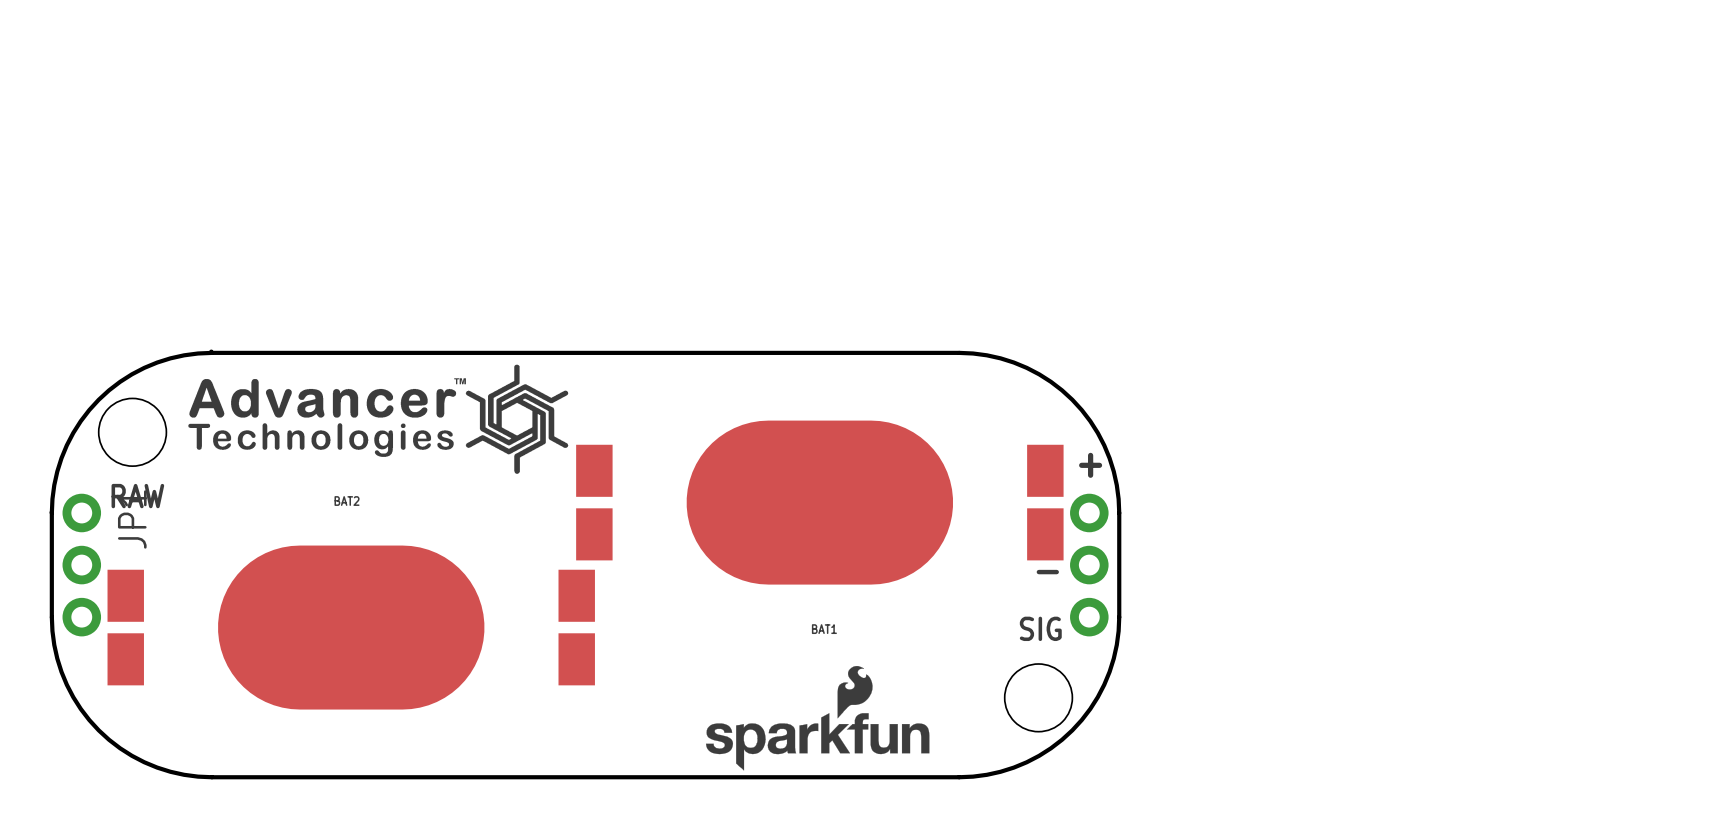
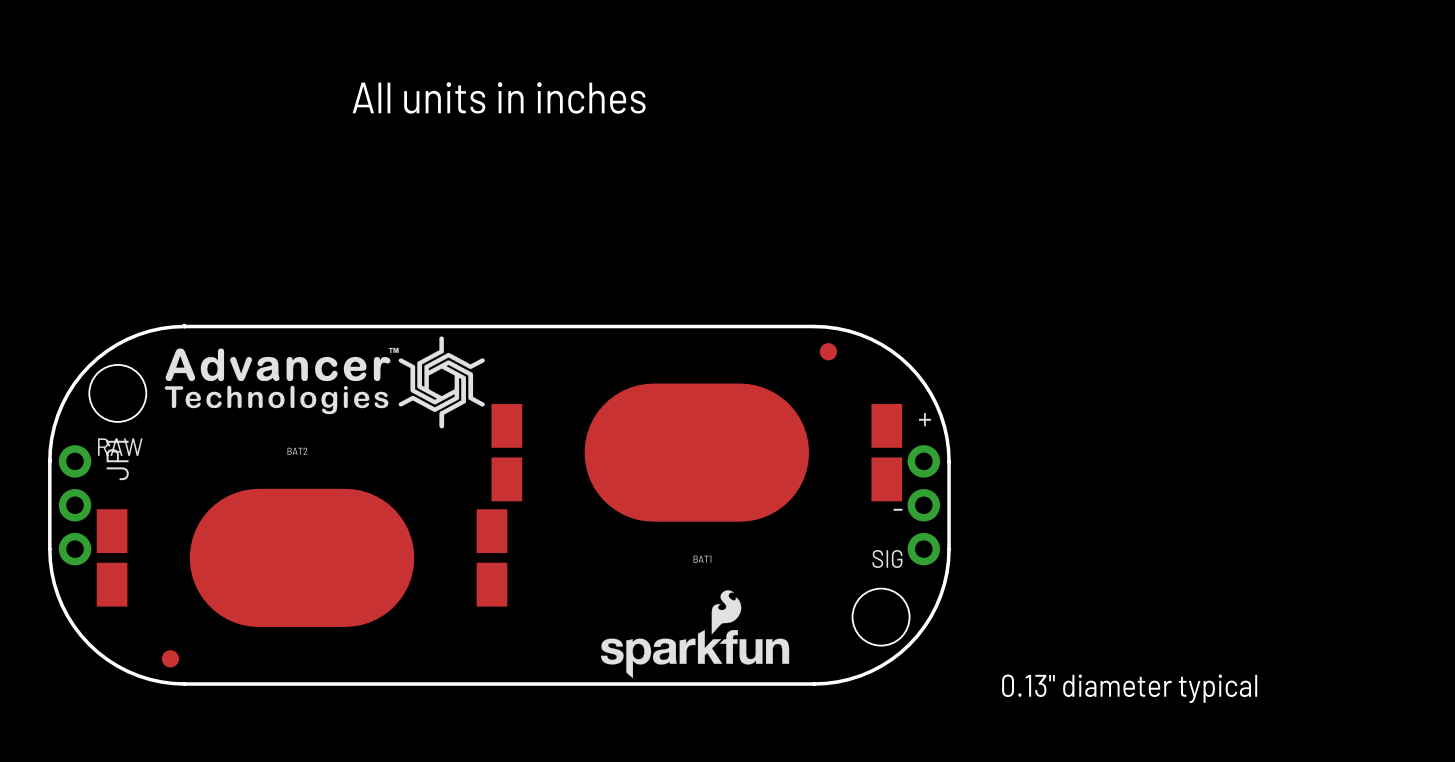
text: none -> All units in inches (499, 97)
part: none -> (828, 351)
part: none -> (170, 658)
text: none -> 0.13" diameter typical (1129, 688)

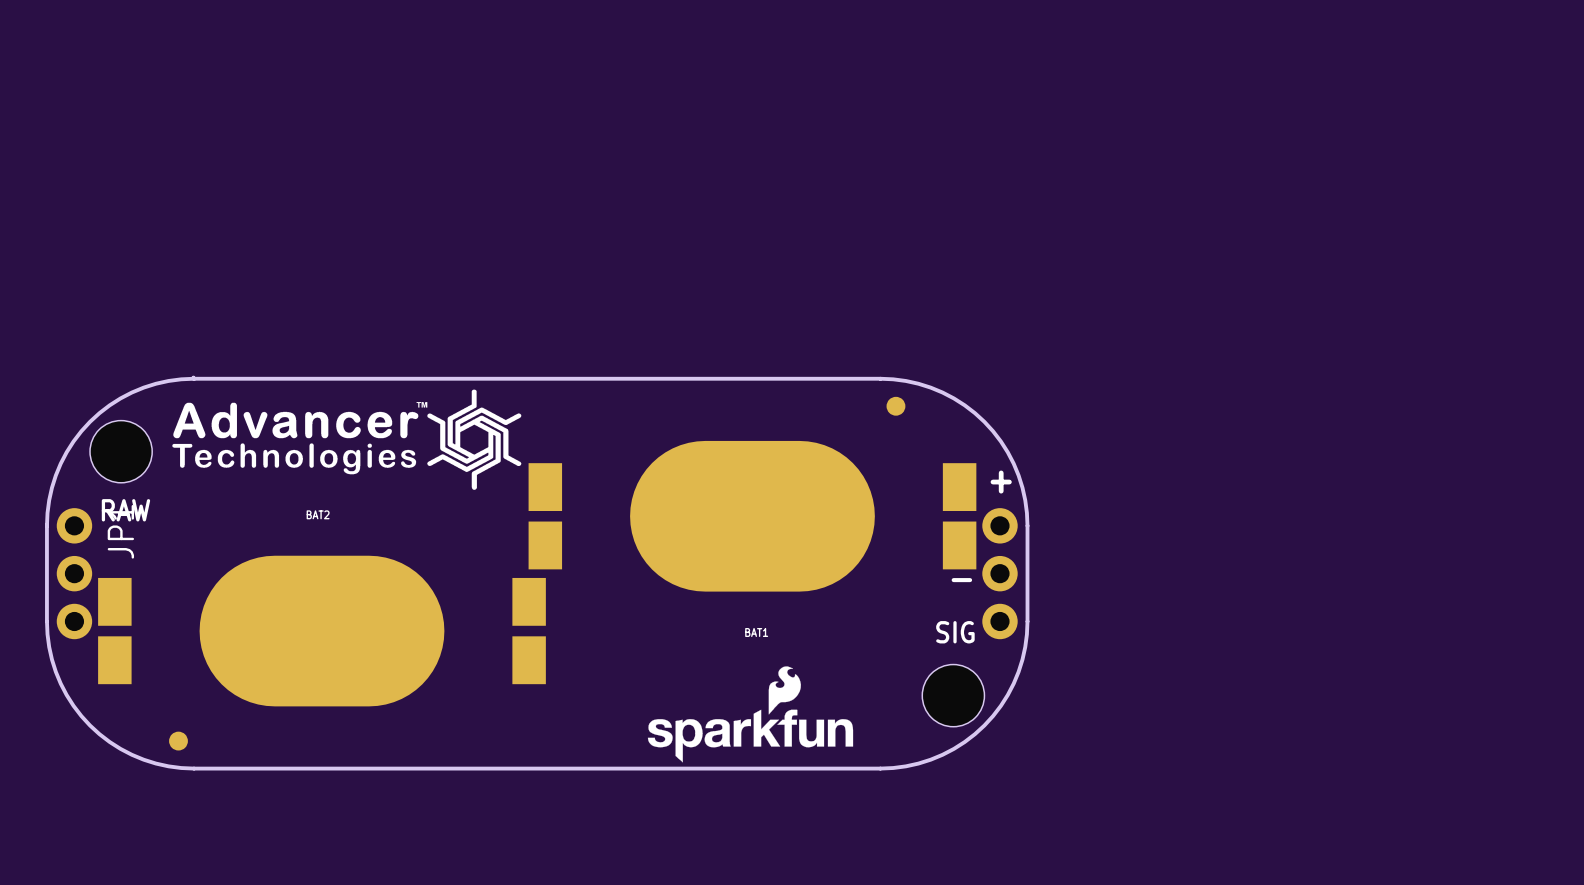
text: All units in inches (499, 97) -> none
text: 0.13" diameter typical (1129, 688) -> none

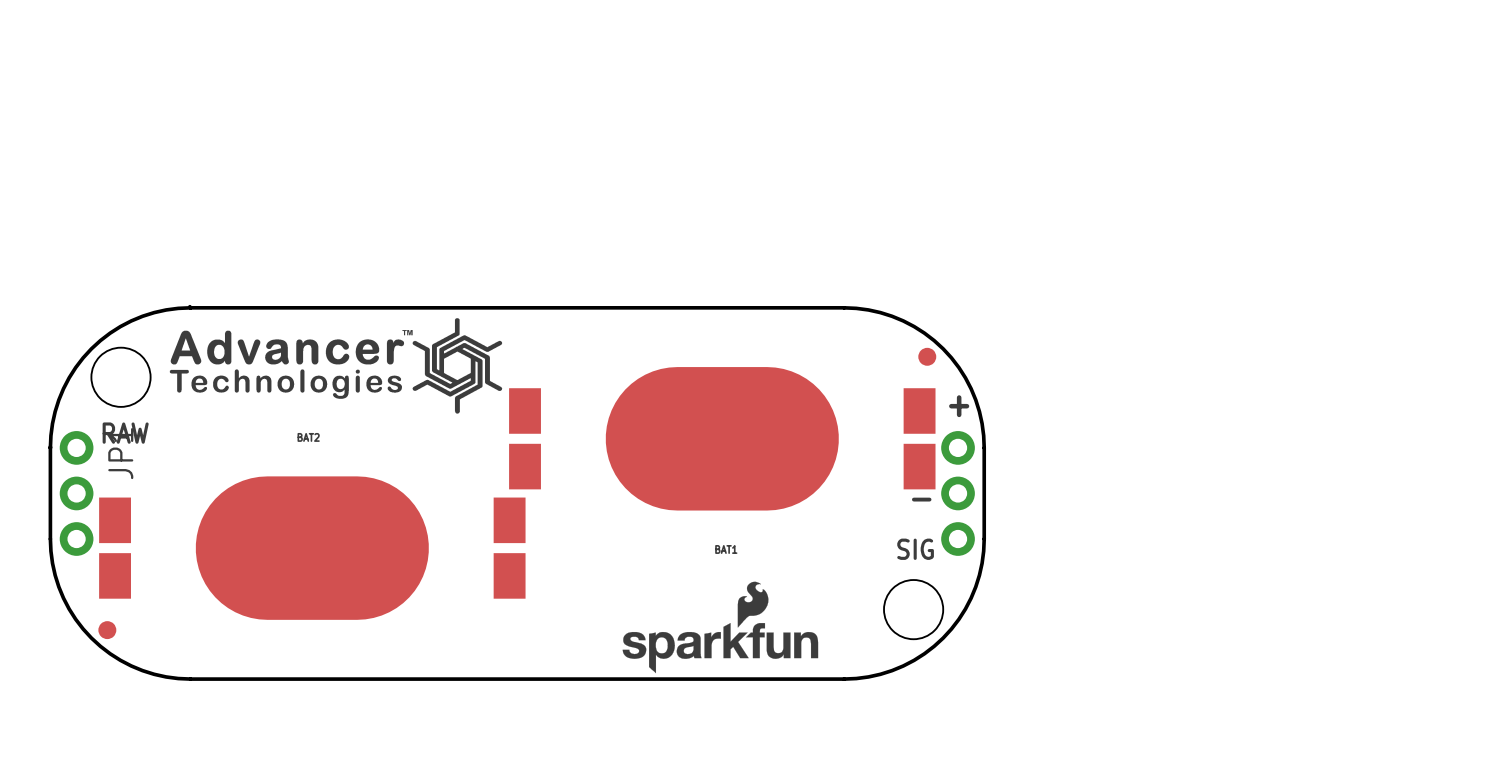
part position: (895, 406) -> (927, 356)
part position: (178, 741) -> (107, 630)

